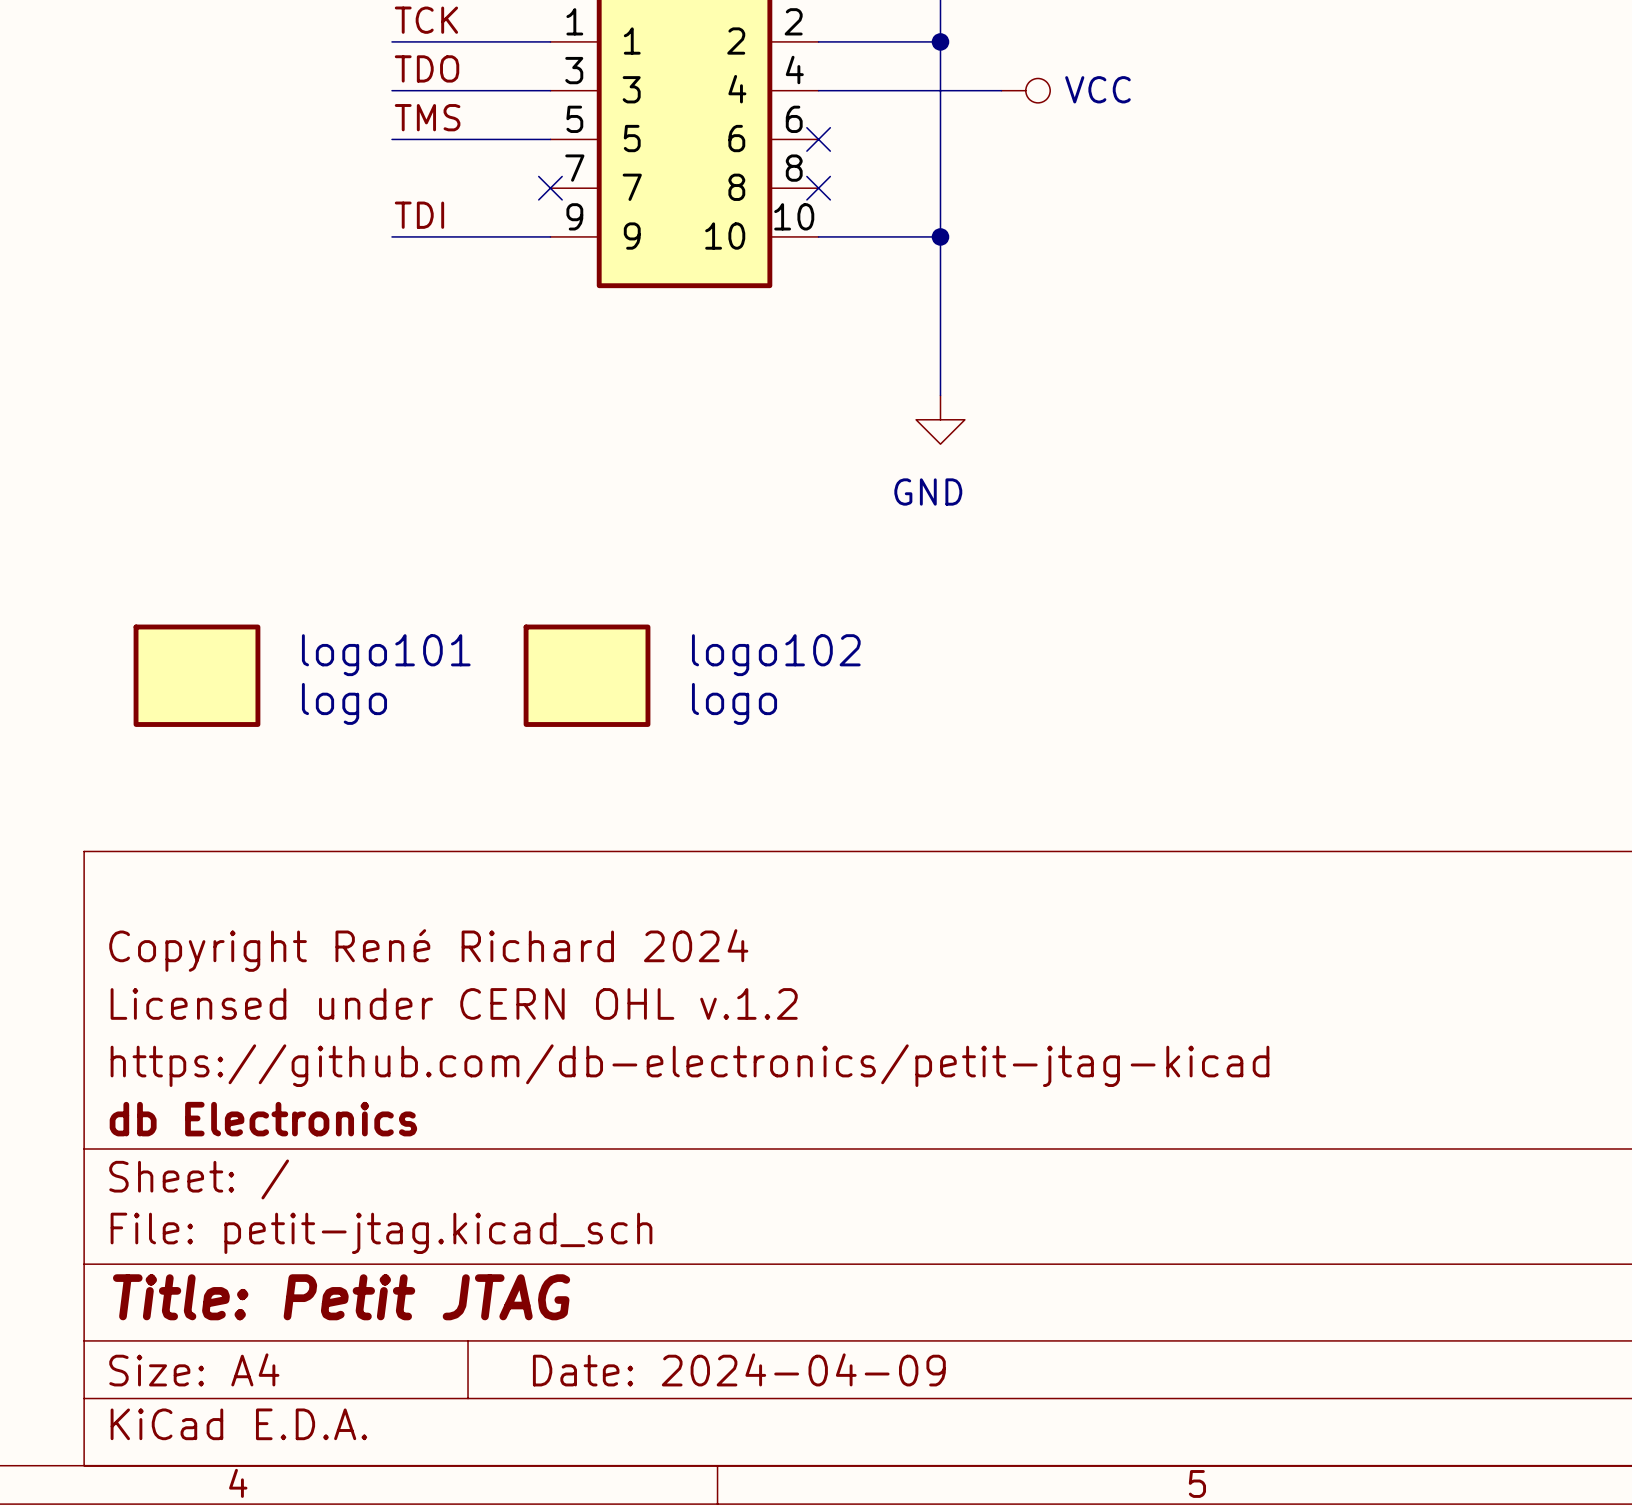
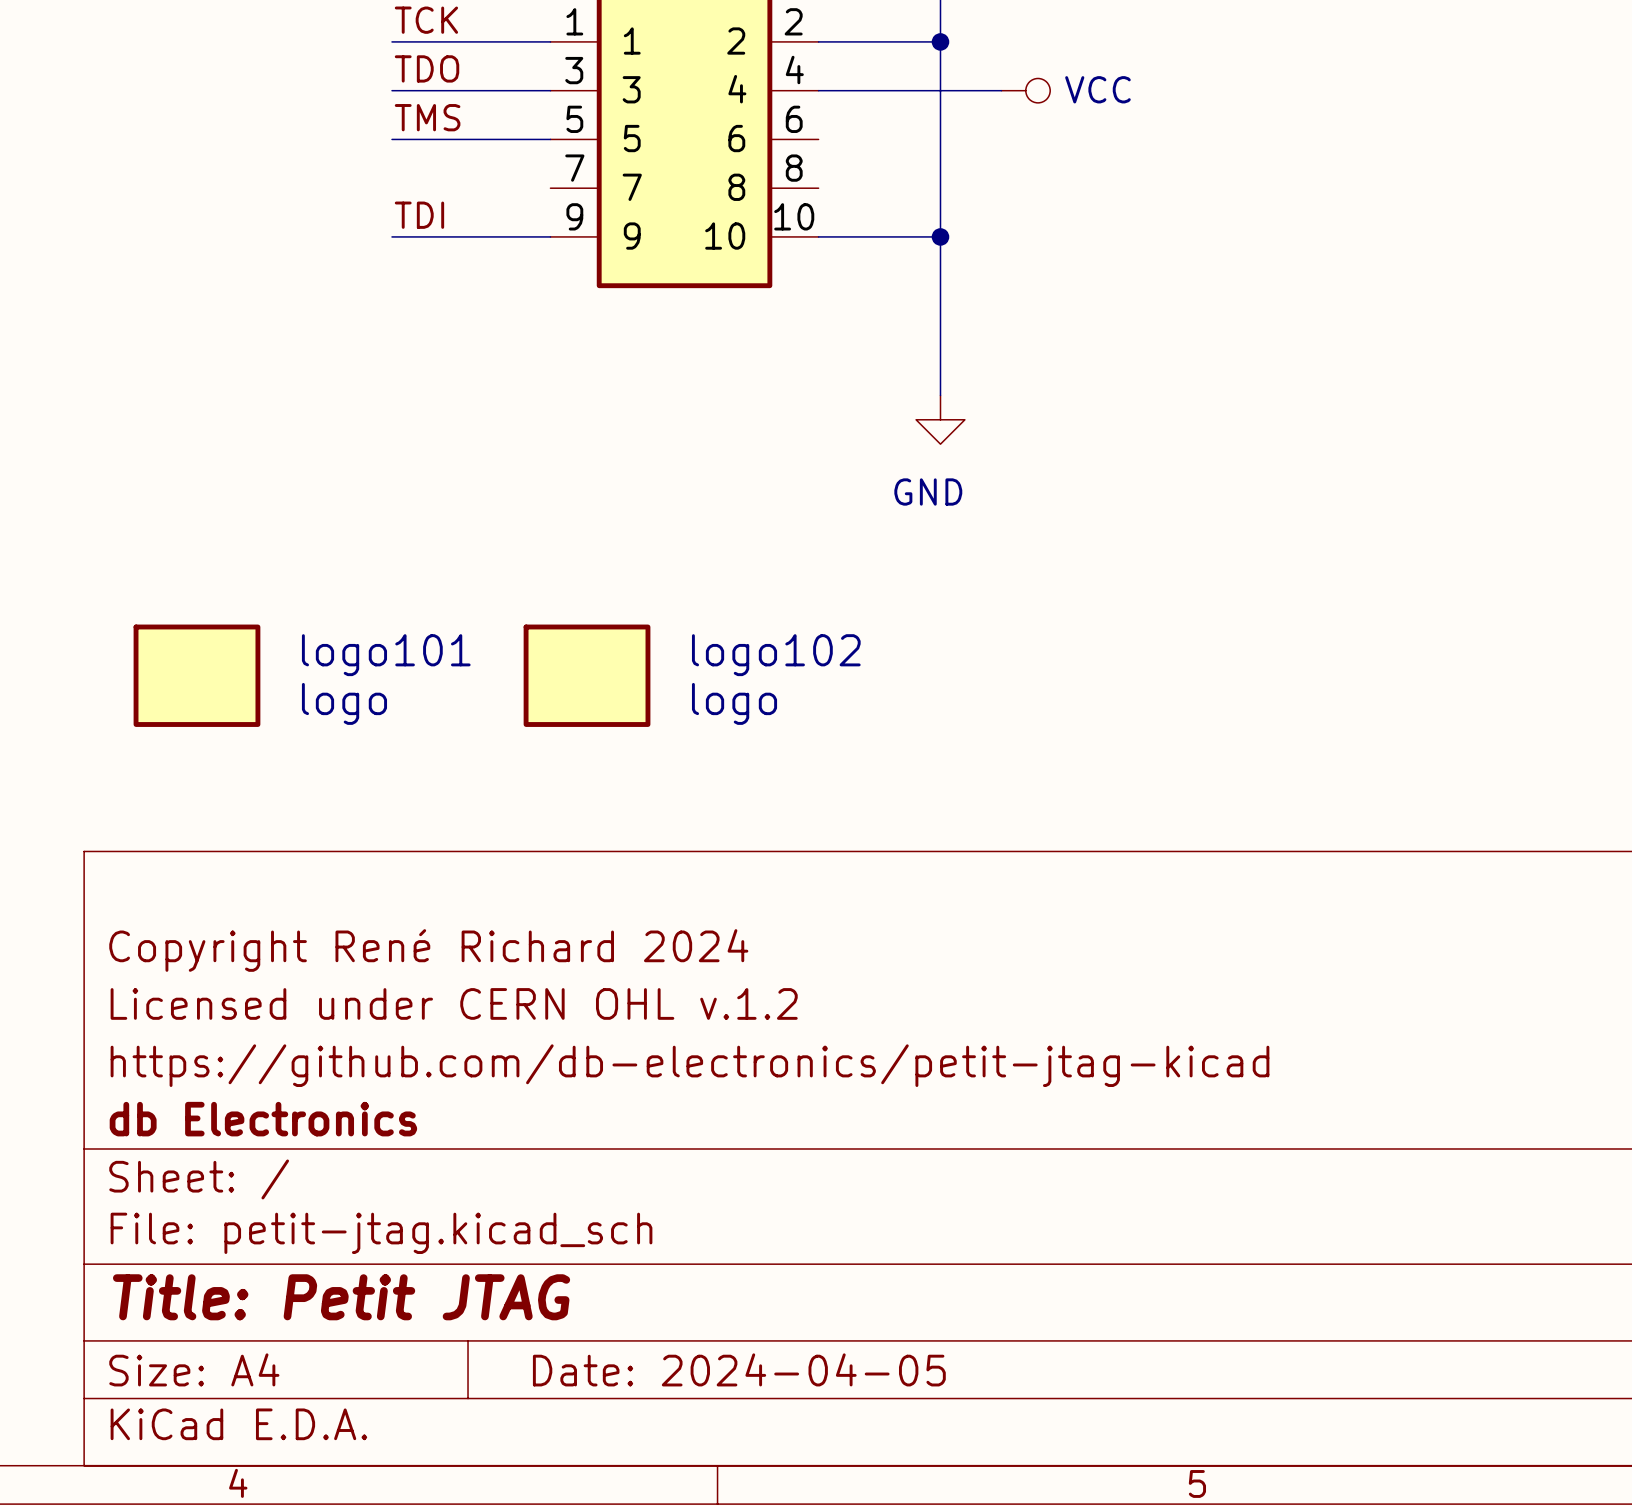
no-connect mark: (818, 139) -> none
no-connect mark: (550, 188) -> none
no-connect mark: (818, 188) -> none
title block: Date: 2024-04-09 (739, 1369) -> Date: 2024-04-05 (739, 1369)

